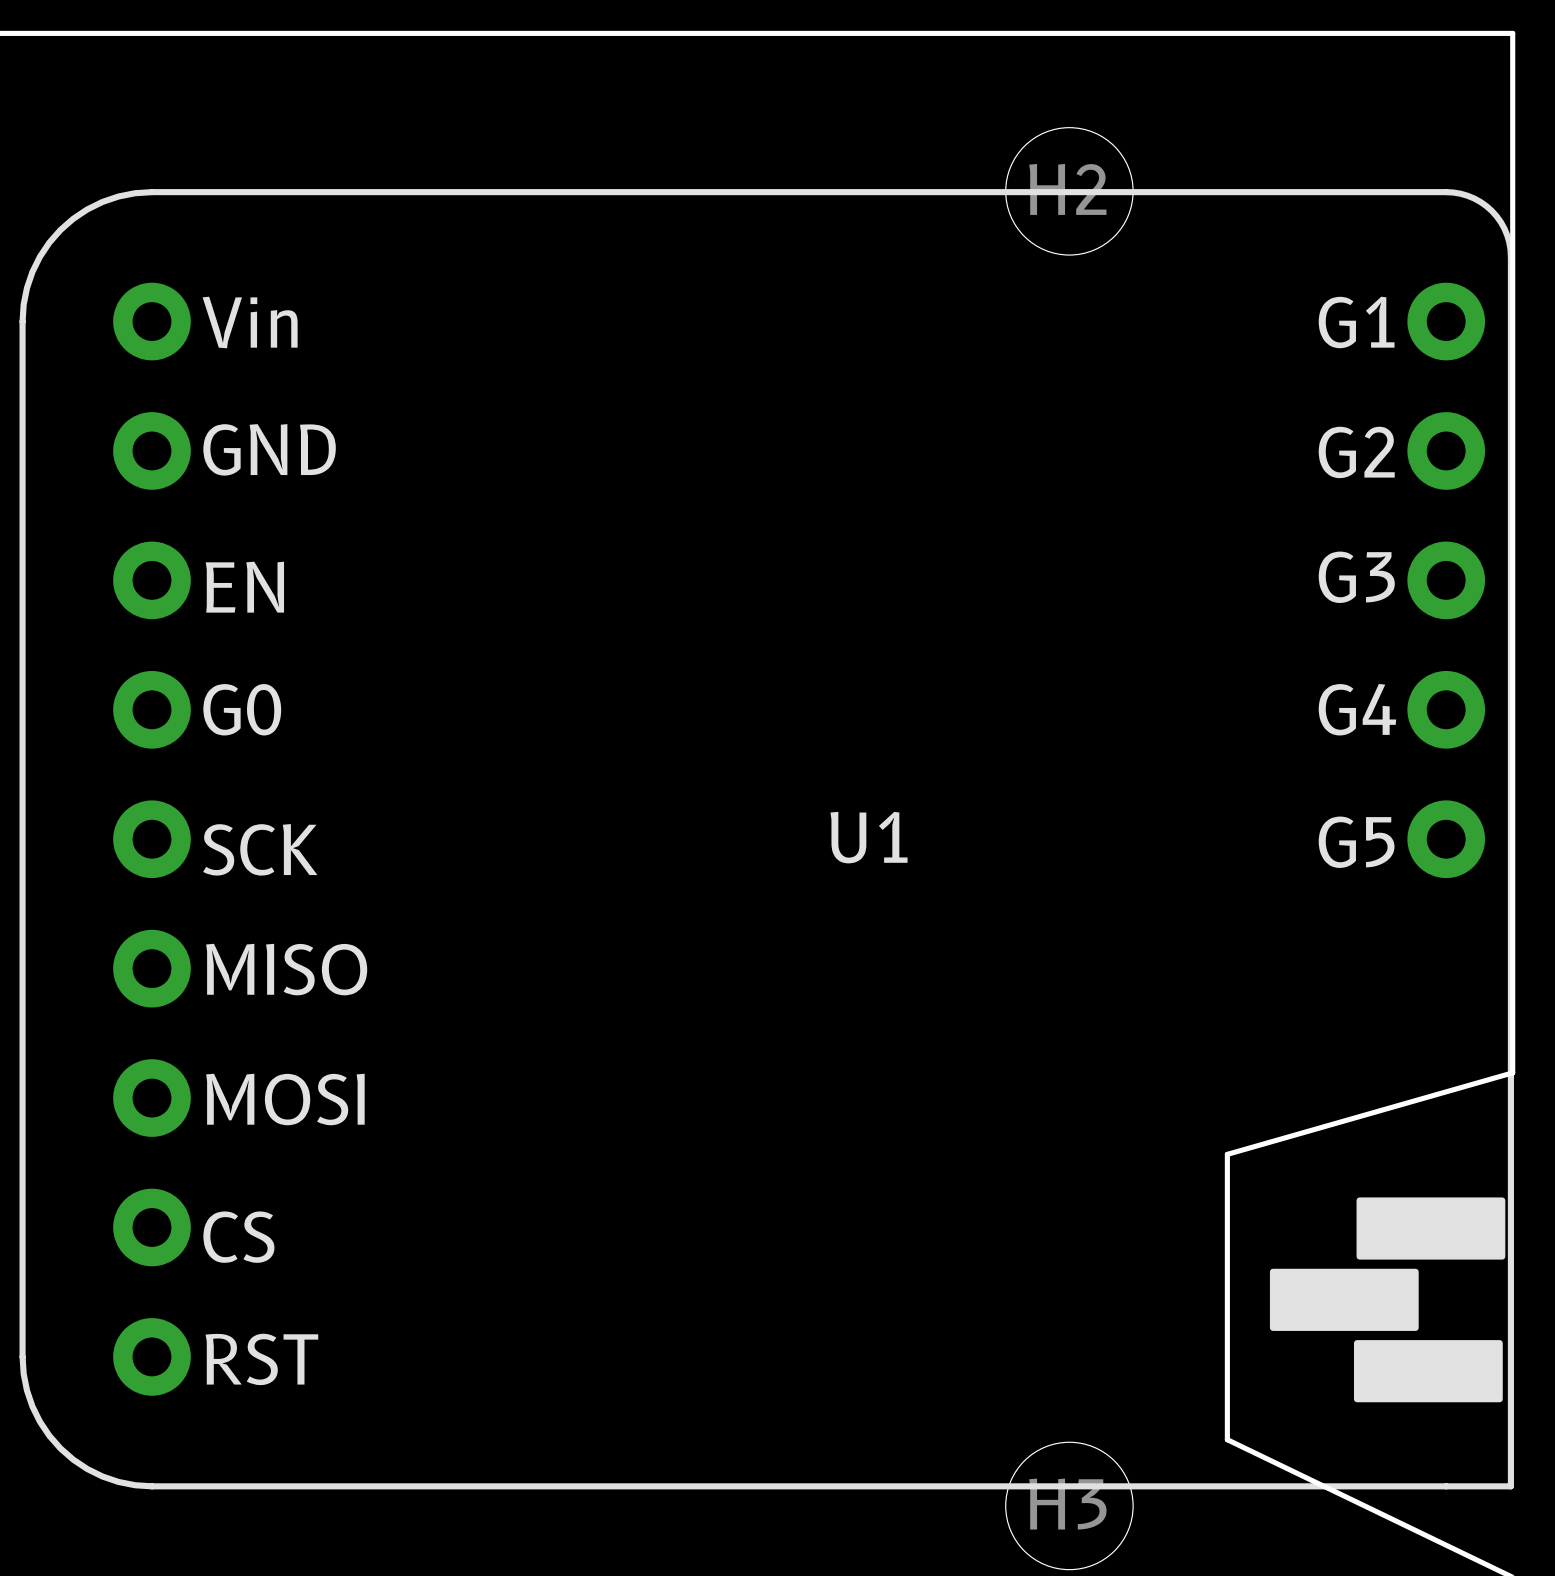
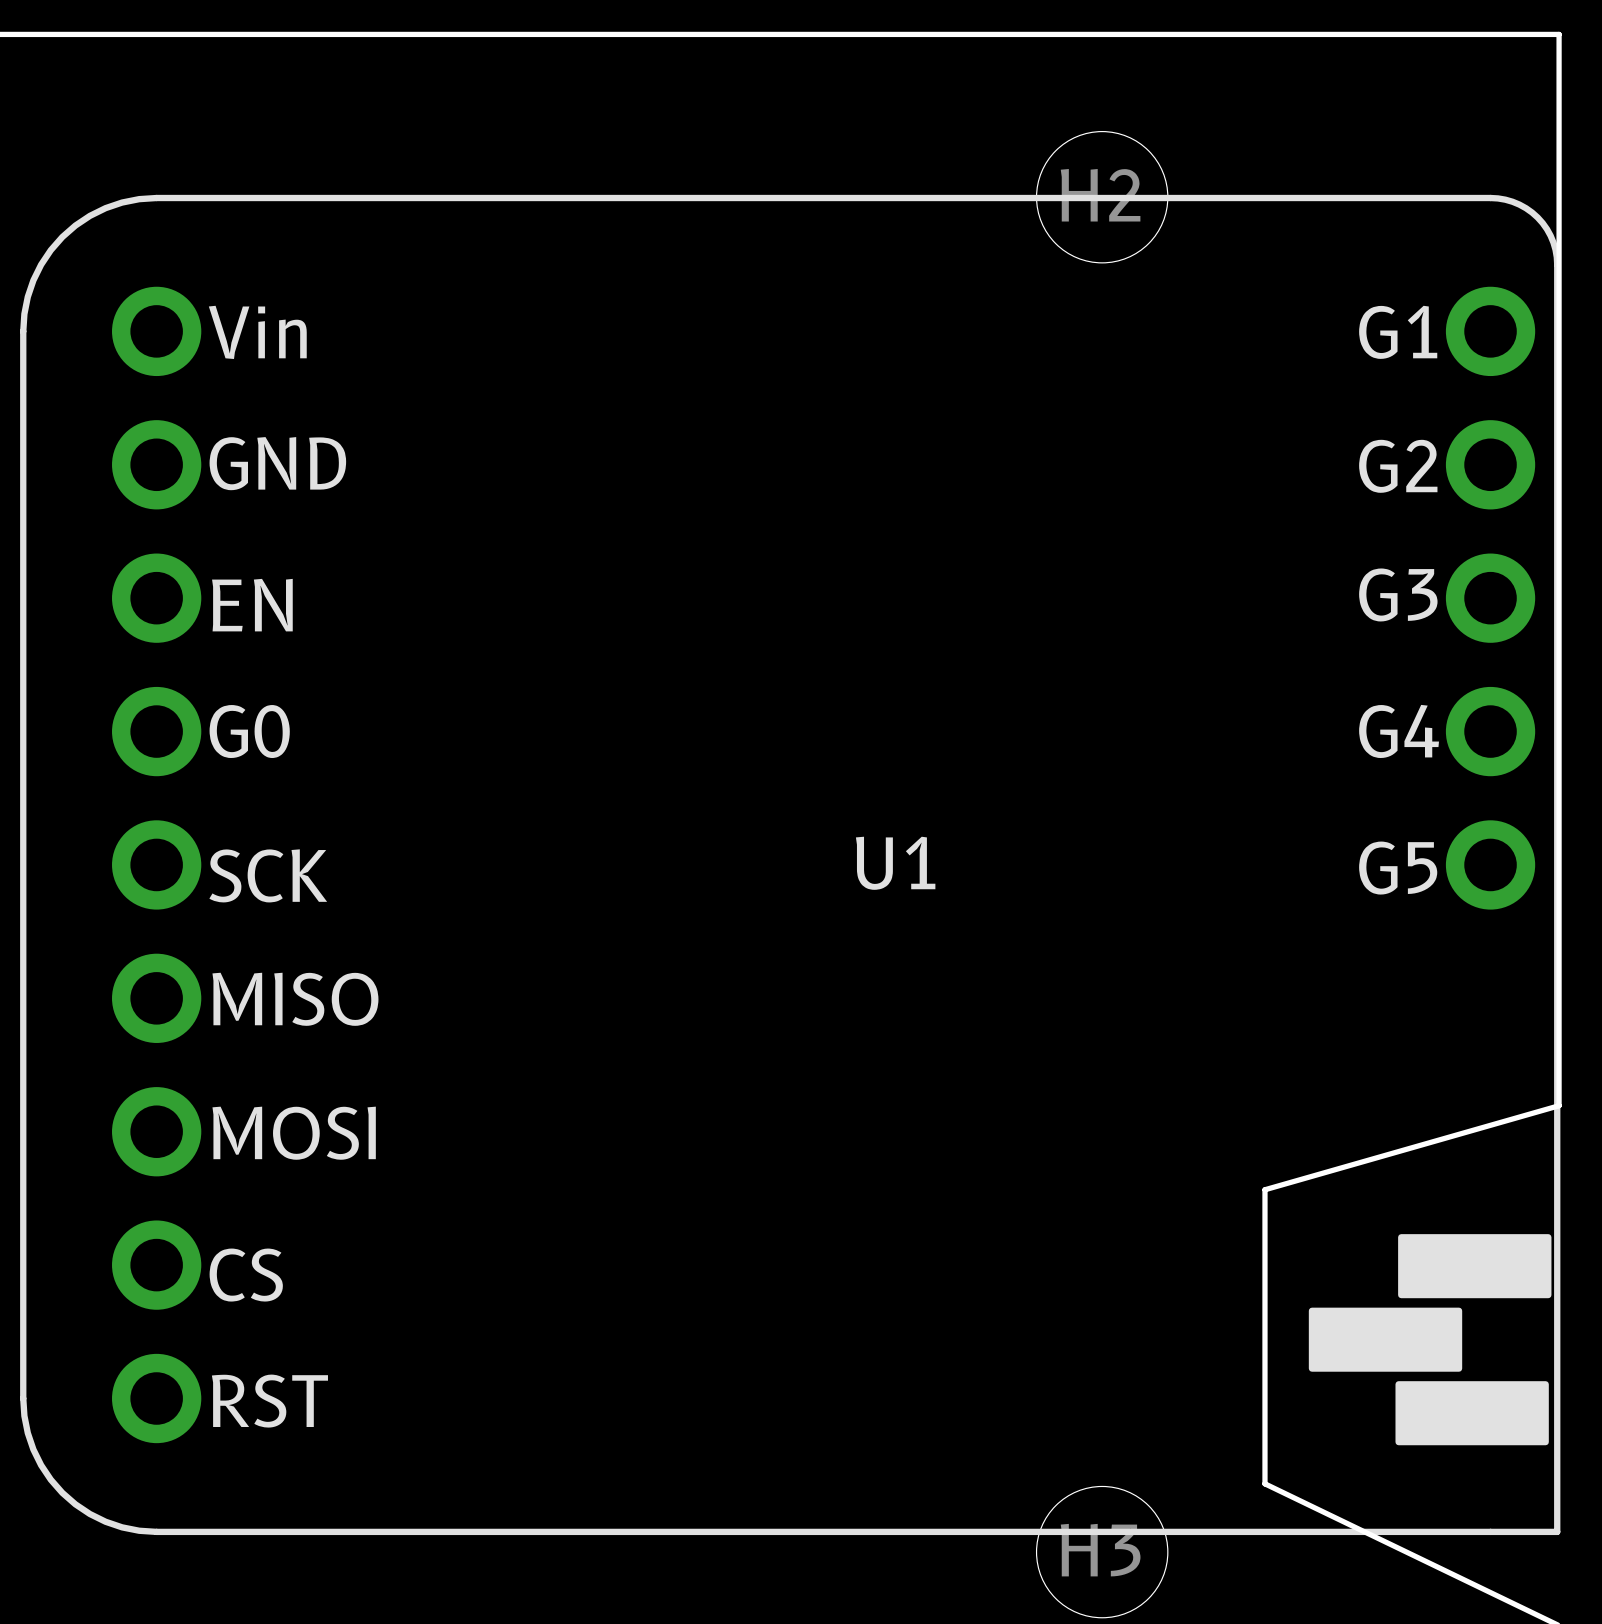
U1 footprint: [19, 189, 1514, 1490] -> [20, 194, 1561, 1536]

